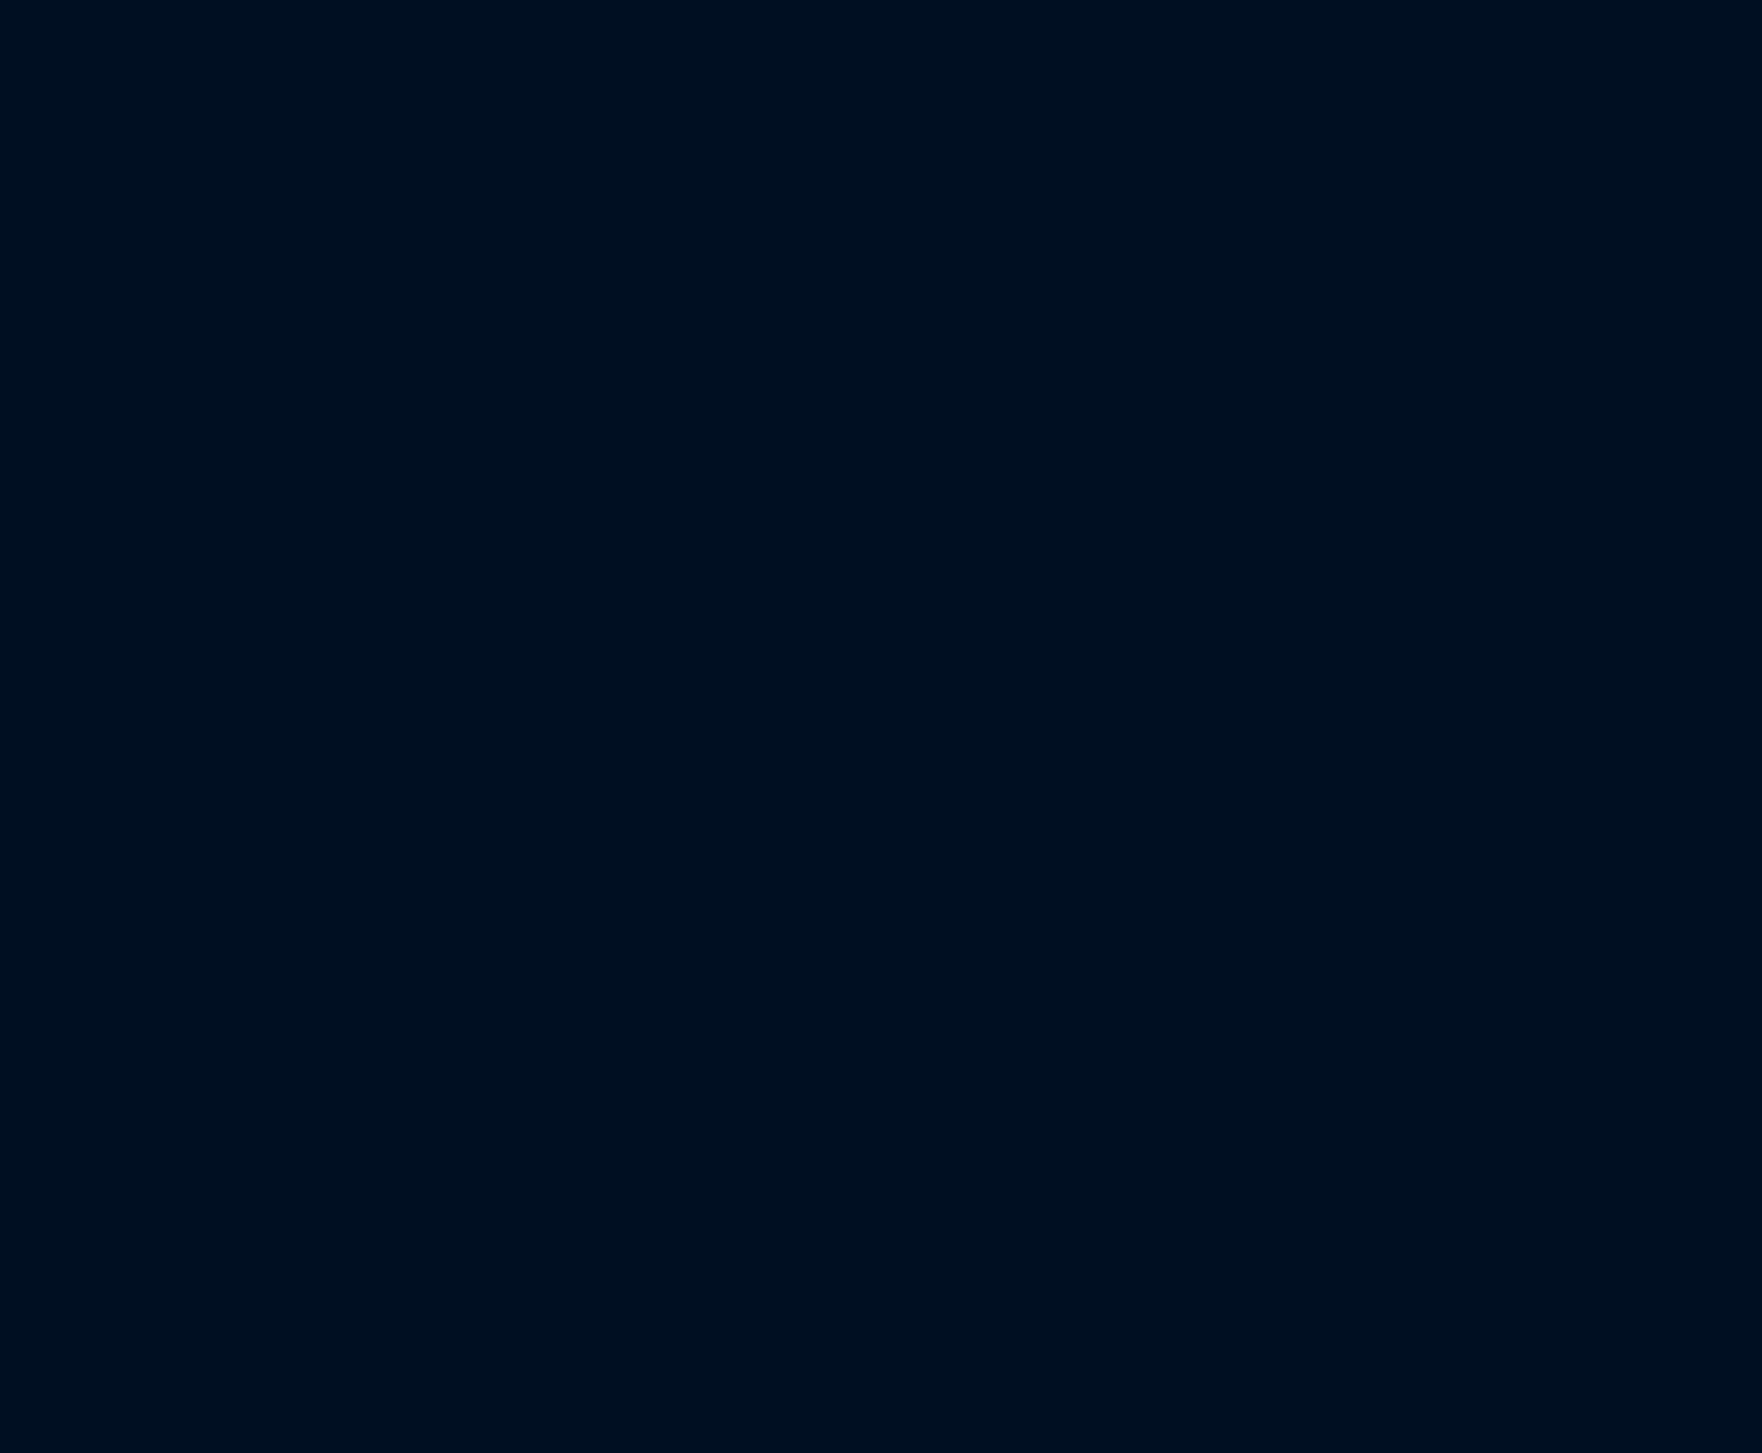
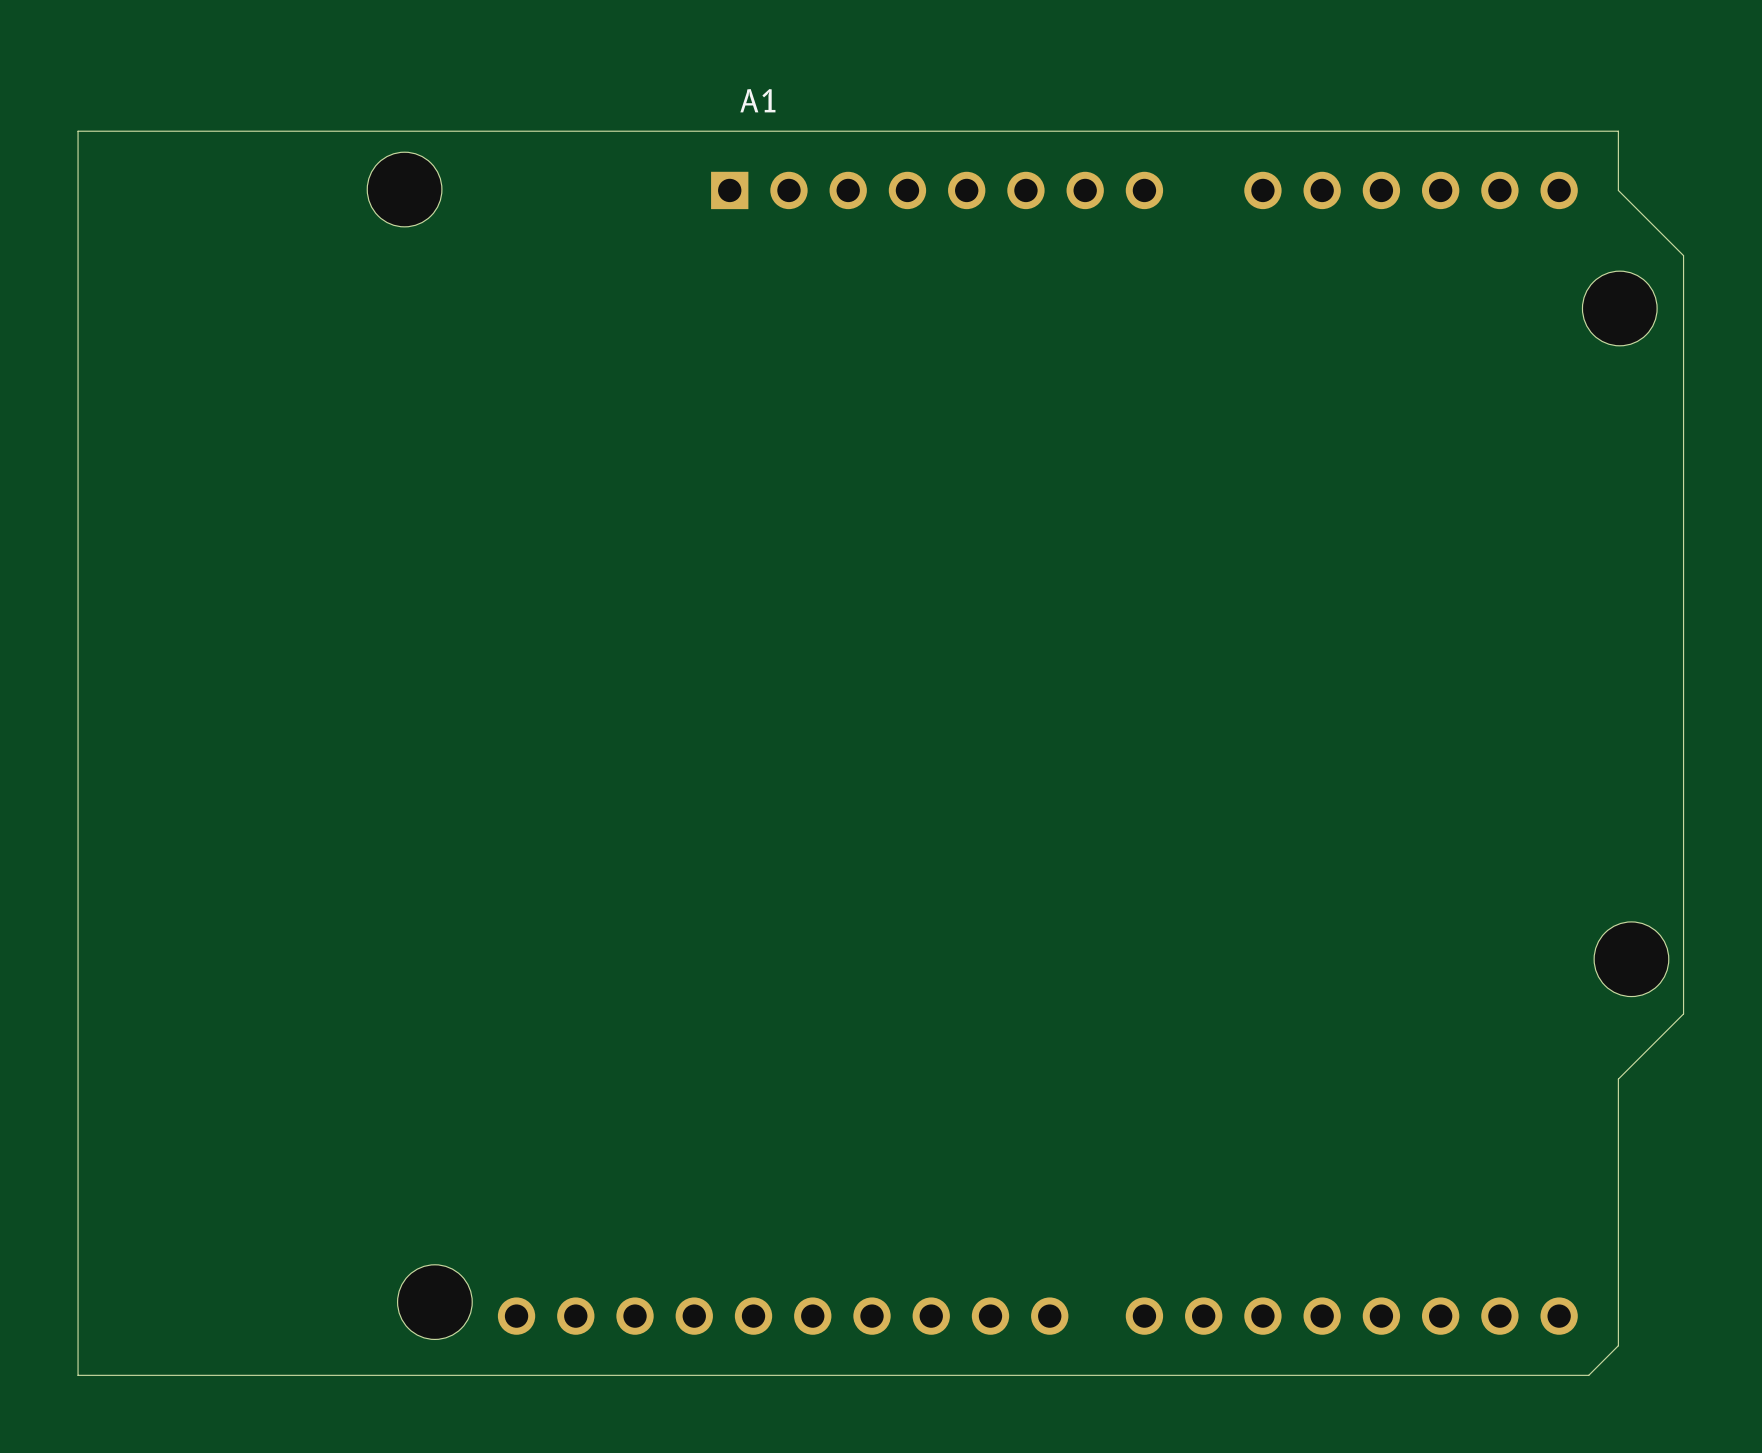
board edge: none -> (78, 131) (1618, 131) (1618, 190) (1683, 255) (1683, 1013) (1618, 1079) (1618, 1345) (1588, 1375) (78, 1375) (78, 131)
A1: none -> (1018, 745)

